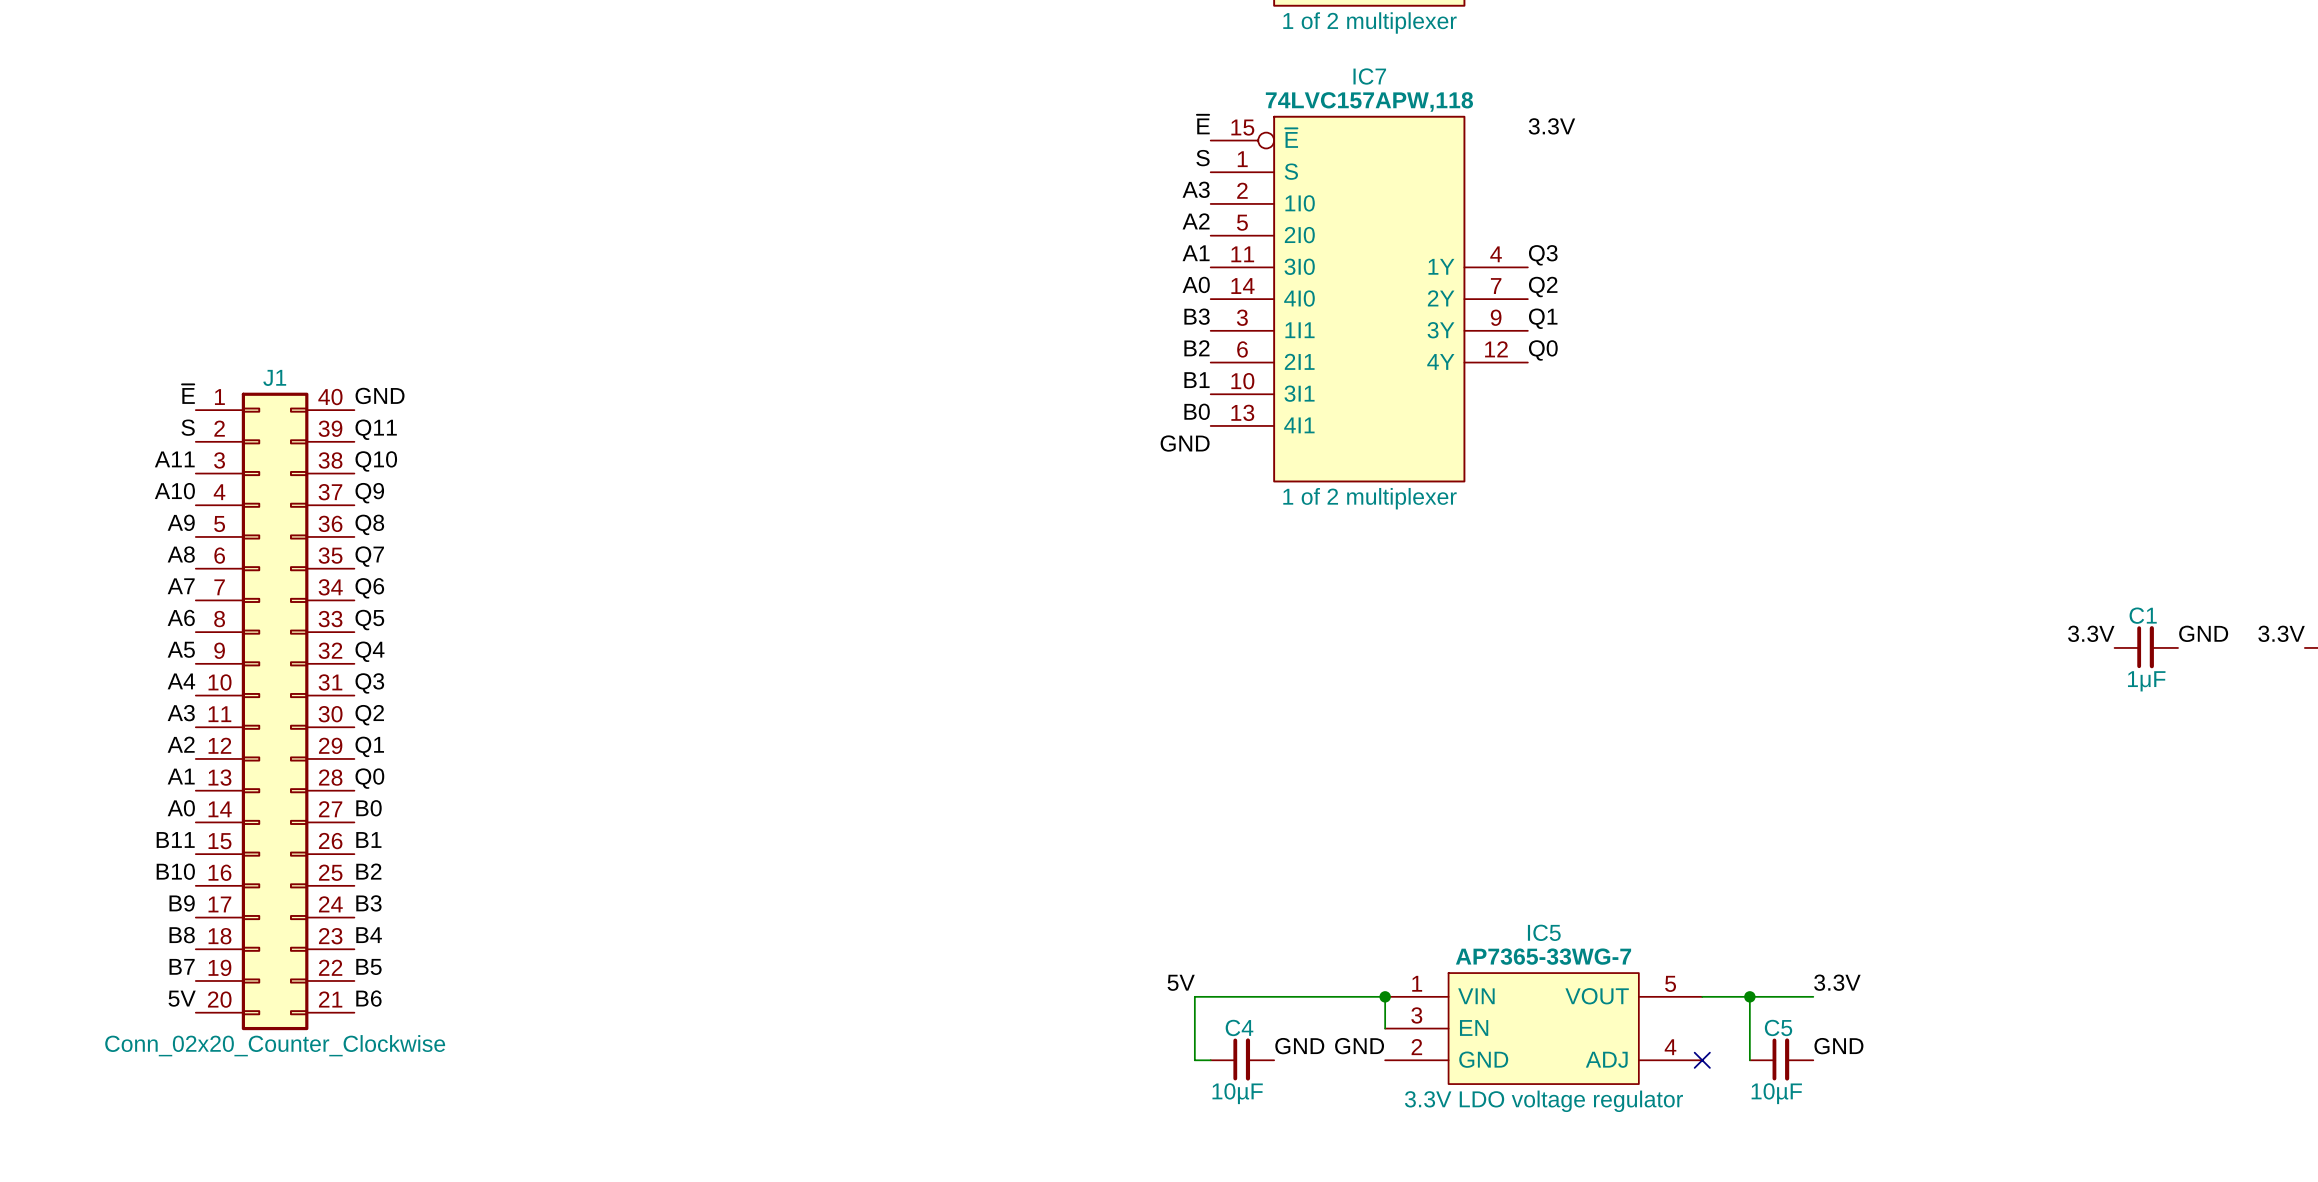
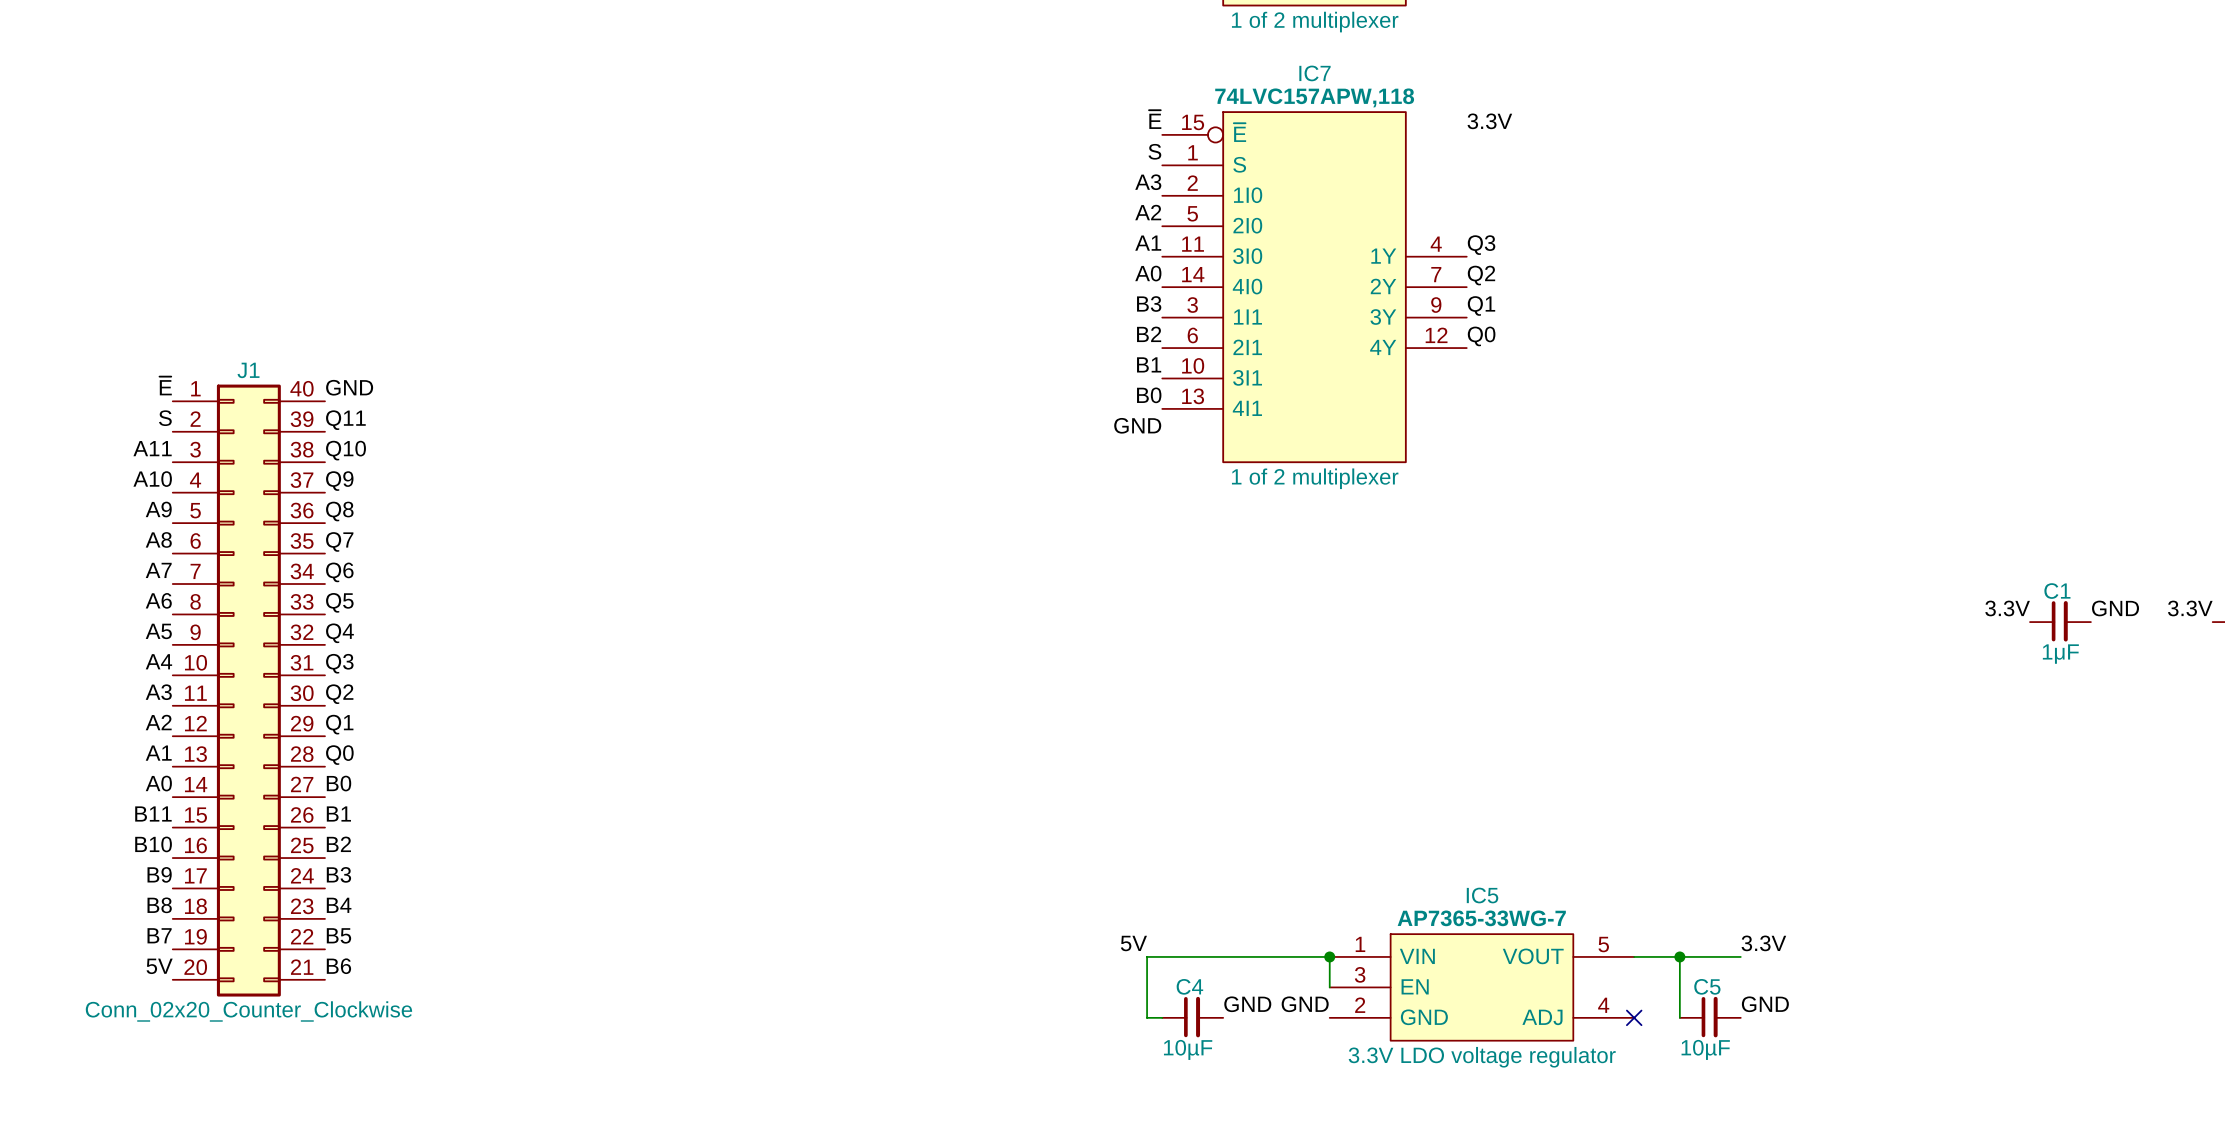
label position: ~{E} (188, 394) -> ~{E} (165, 385)
label position: GND (380, 395) -> GND (349, 387)
label position: S (188, 427) -> S (165, 418)
label position: Q11 (376, 429) -> Q11 (345, 420)
label position: A11 (174, 459) -> A11 (152, 448)
label position: Q10 (376, 461) -> Q10 (346, 450)
label position: A10 (174, 491) -> A10 (152, 479)
label position: Q9 (369, 493) -> Q9 (339, 481)
label position: A9 (181, 522) -> A9 (158, 509)
label position: Q8 (369, 524) -> Q8 (339, 511)
label position: A8 (181, 554) -> A8 (158, 539)
label position: Q7 (369, 556) -> Q7 (339, 541)
label position: A7 (181, 586) -> A7 (158, 570)
label position: Q6 (369, 588) -> Q6 (339, 572)
label position: A6 (181, 617) -> A6 (158, 600)
label position: Q5 (369, 620) -> Q5 (339, 602)
label position: A5 (181, 649) -> A5 (158, 631)
label position: Q4 (369, 651) -> Q4 (339, 633)
label position: A4 (181, 681) -> A4 (158, 661)
label position: Q3 (369, 683) -> Q3 (339, 663)
J1 position: (275, 711) -> (248, 690)
label position: A3 (181, 713) -> A3 (158, 692)
label position: Q2 (369, 715) -> Q2 (339, 694)
label position: A2 (181, 744) -> A2 (158, 722)
label position: Q1 (369, 746) -> Q1 (339, 724)
label position: A1 (181, 776) -> A1 (158, 753)
label position: Q0 (369, 778) -> Q0 (339, 755)
label position: A0 (181, 808) -> A0 (158, 783)
label position: B0 (368, 808) -> B0 (339, 783)
label position: B11 (175, 839) -> B11 (153, 813)
label position: B1 (368, 839) -> B1 (338, 813)
label position: B10 (175, 871) -> B10 (153, 844)
label position: B2 (368, 871) -> B2 (338, 844)
label position: B9 (182, 903) -> B9 (159, 874)
label position: B3 (368, 903) -> B3 (338, 874)
label position: B8 (182, 935) -> B8 (159, 905)
label position: B4 (369, 935) -> B4 (339, 905)
label position: B7 (182, 966) -> B7 (159, 935)
label position: B5 (368, 966) -> B5 (338, 935)
label position: 5V (182, 998) -> 5V (159, 966)
label position: B6 (368, 998) -> B6 (338, 966)

